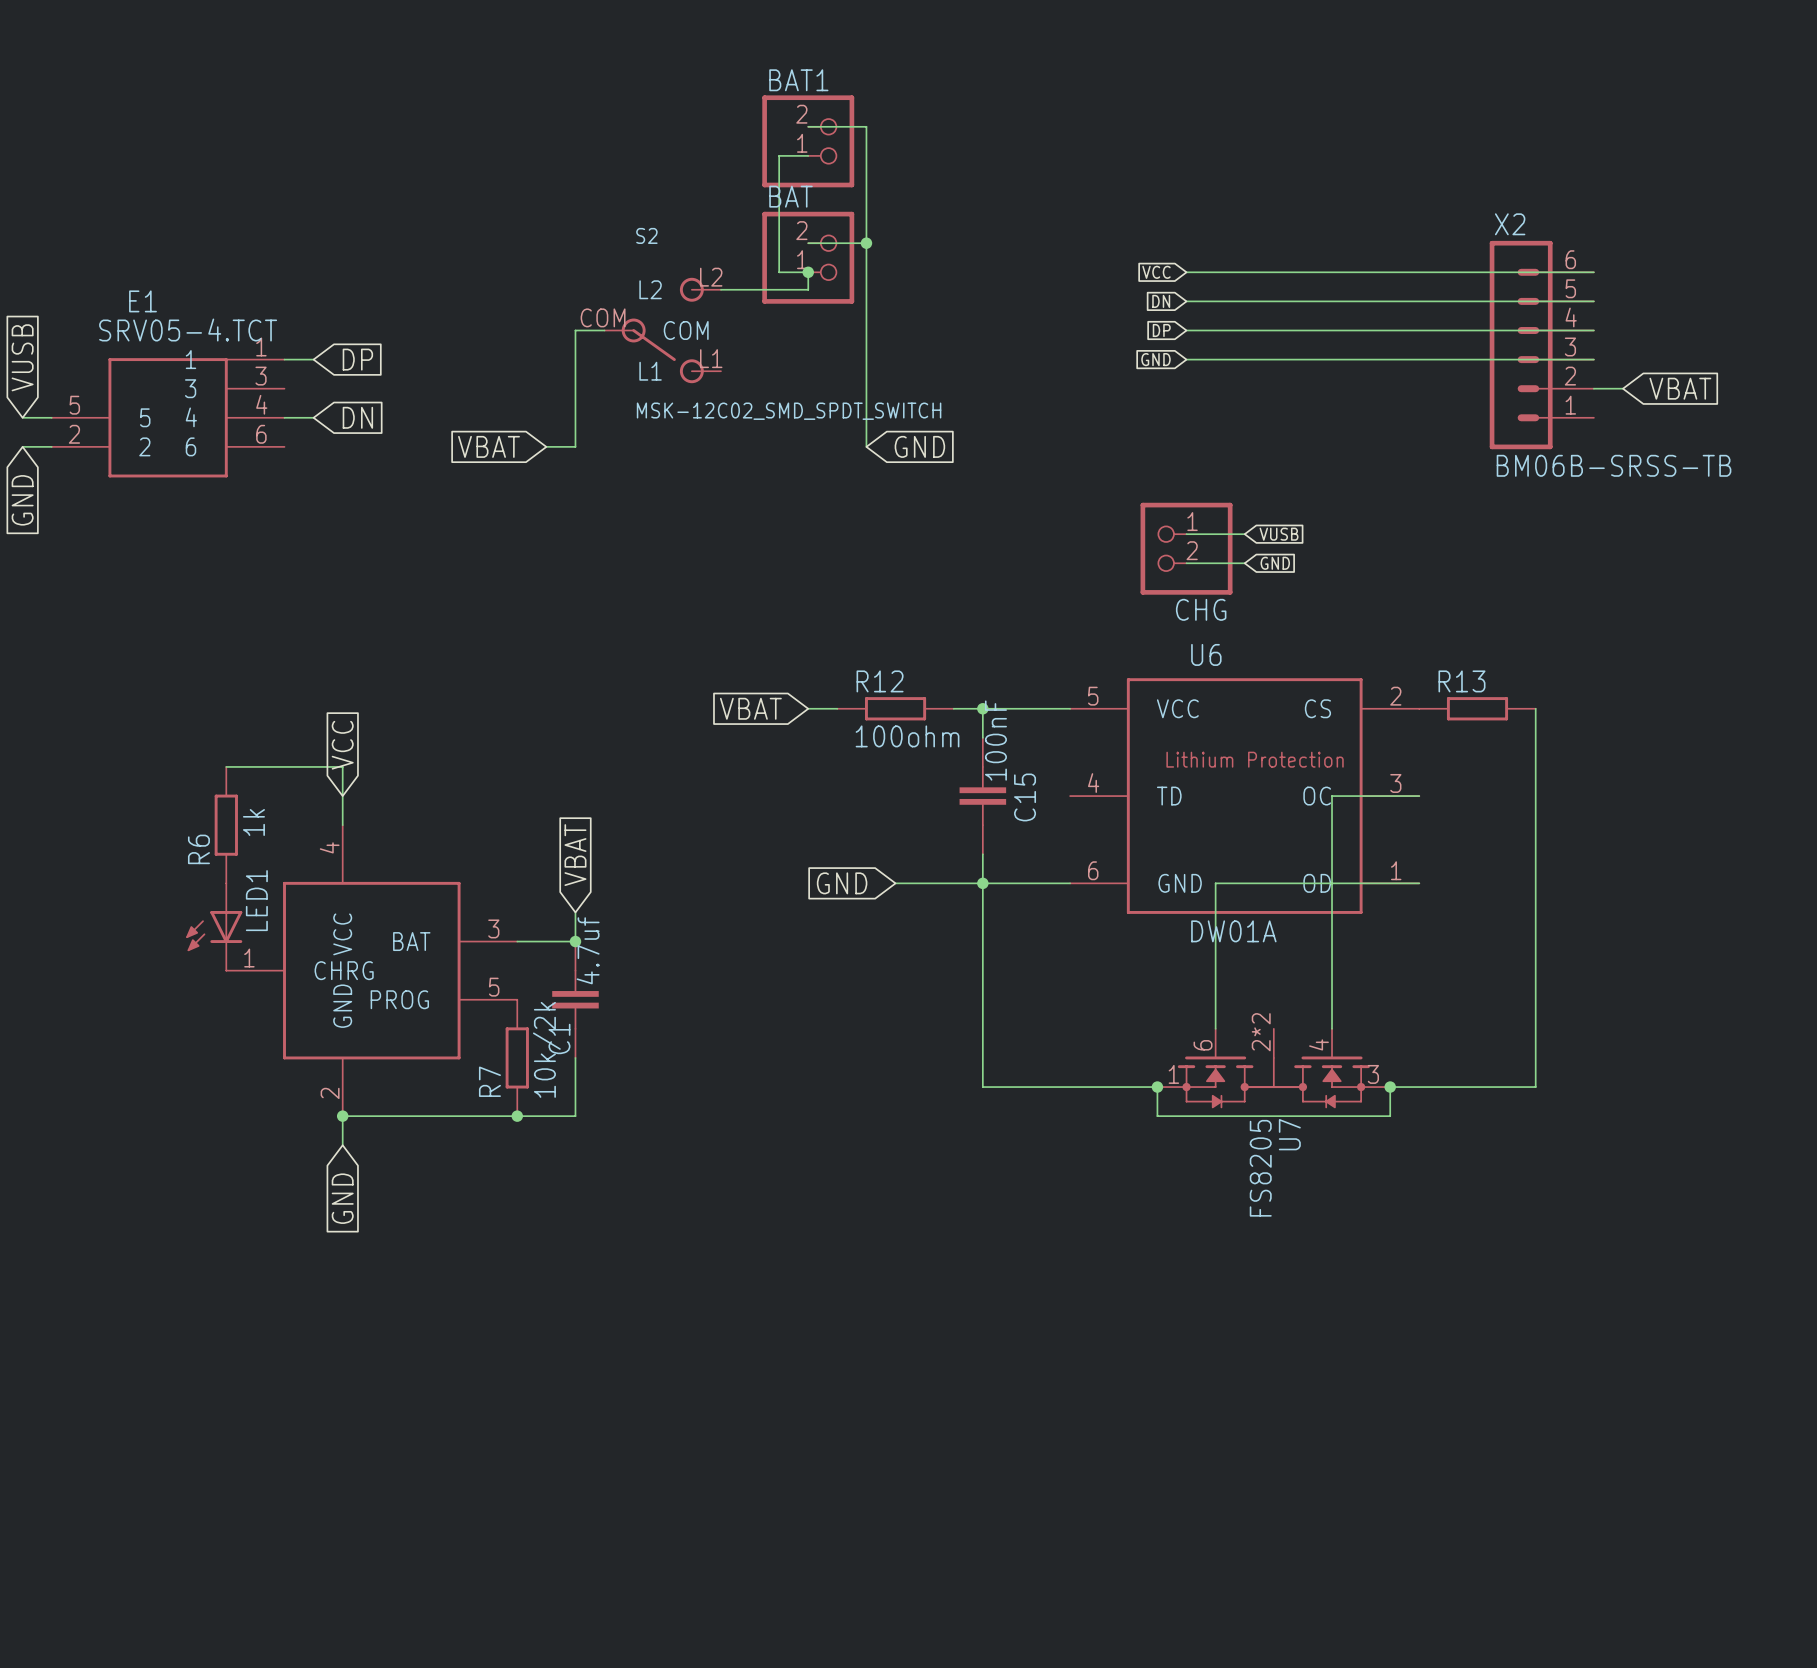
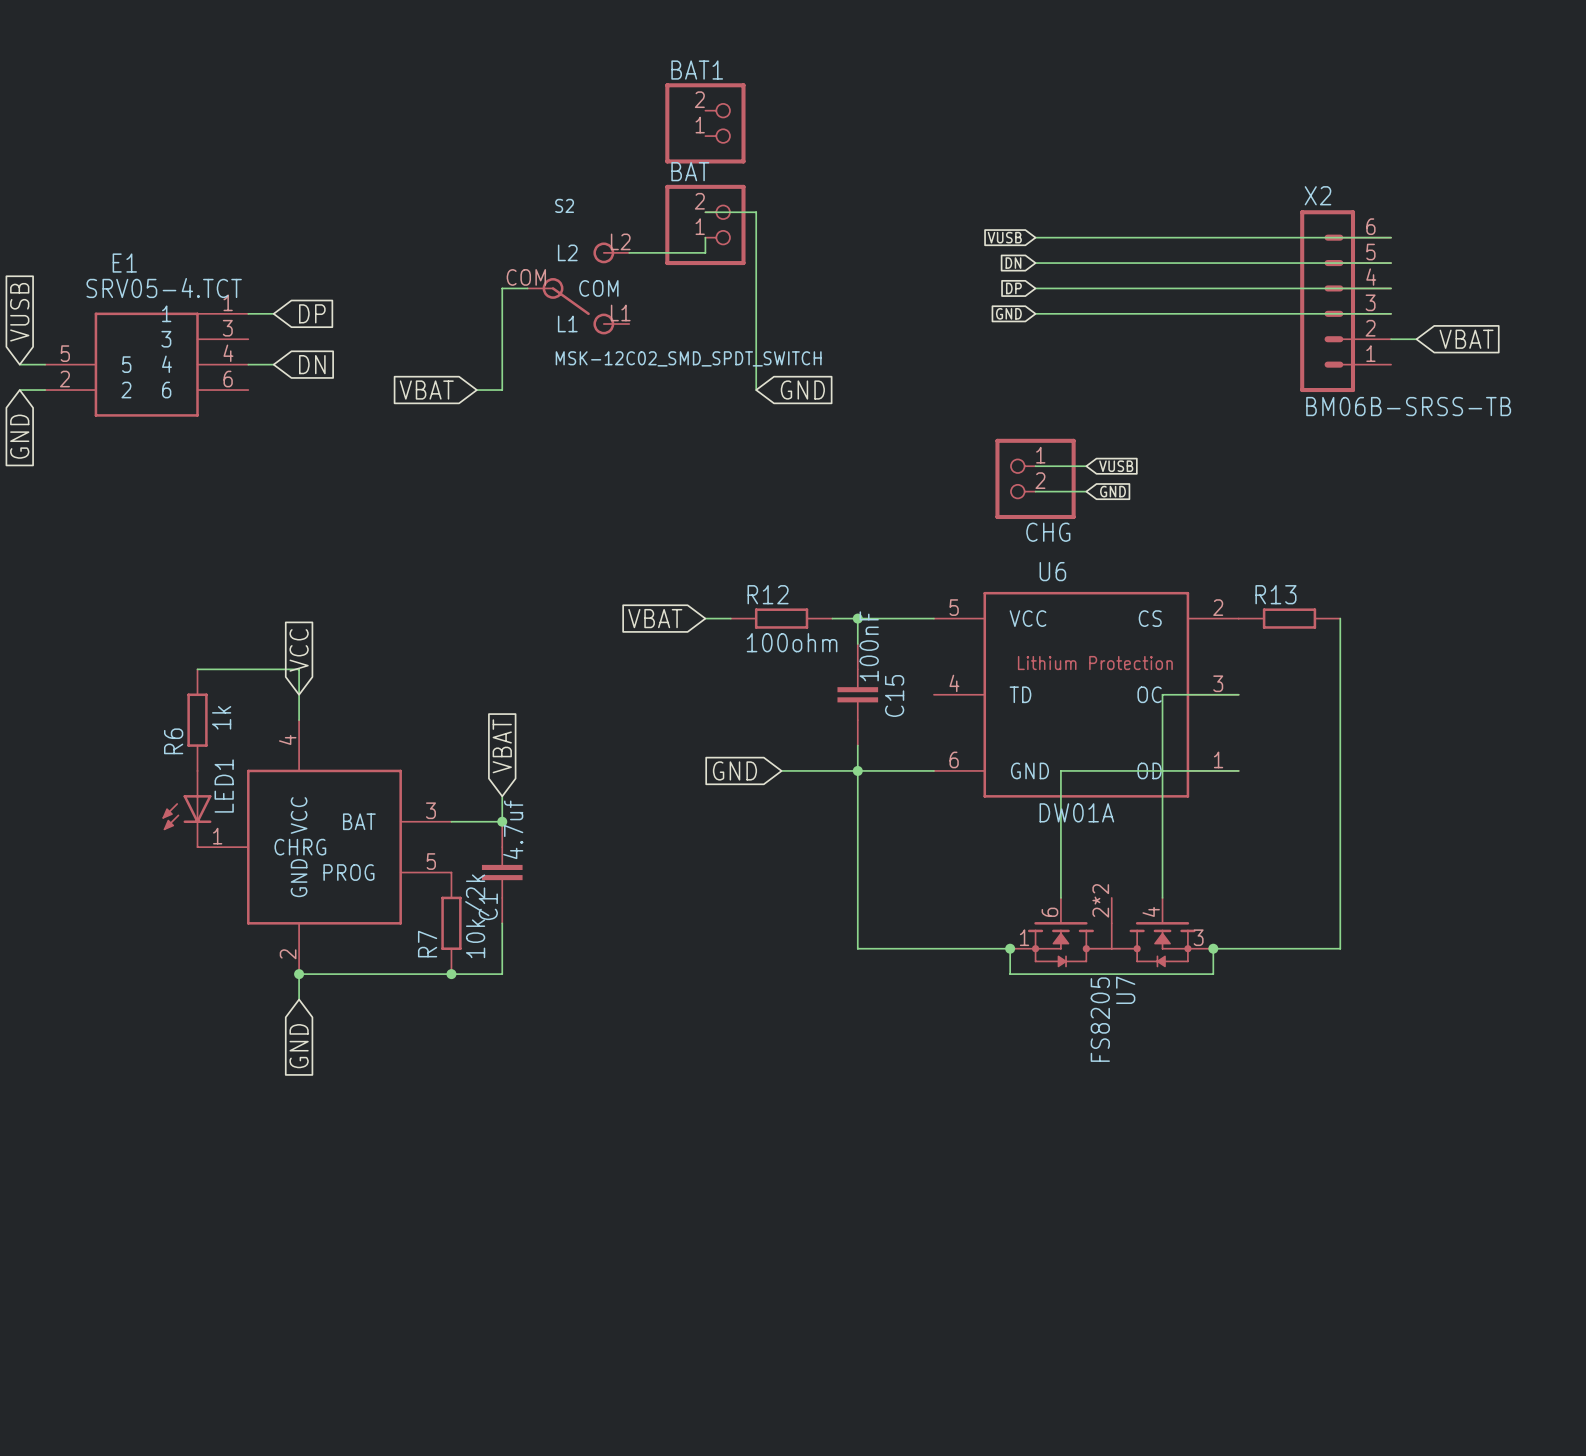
wire: (808, 126) (866, 126) (866, 243) -> none
wire: (808, 155) (779, 155) (779, 272) (808, 272) -> none
junction: (866, 243) -> none
junction: (808, 272) -> none
global label: VCC (1156, 272) -> VUSB (1004, 237)

